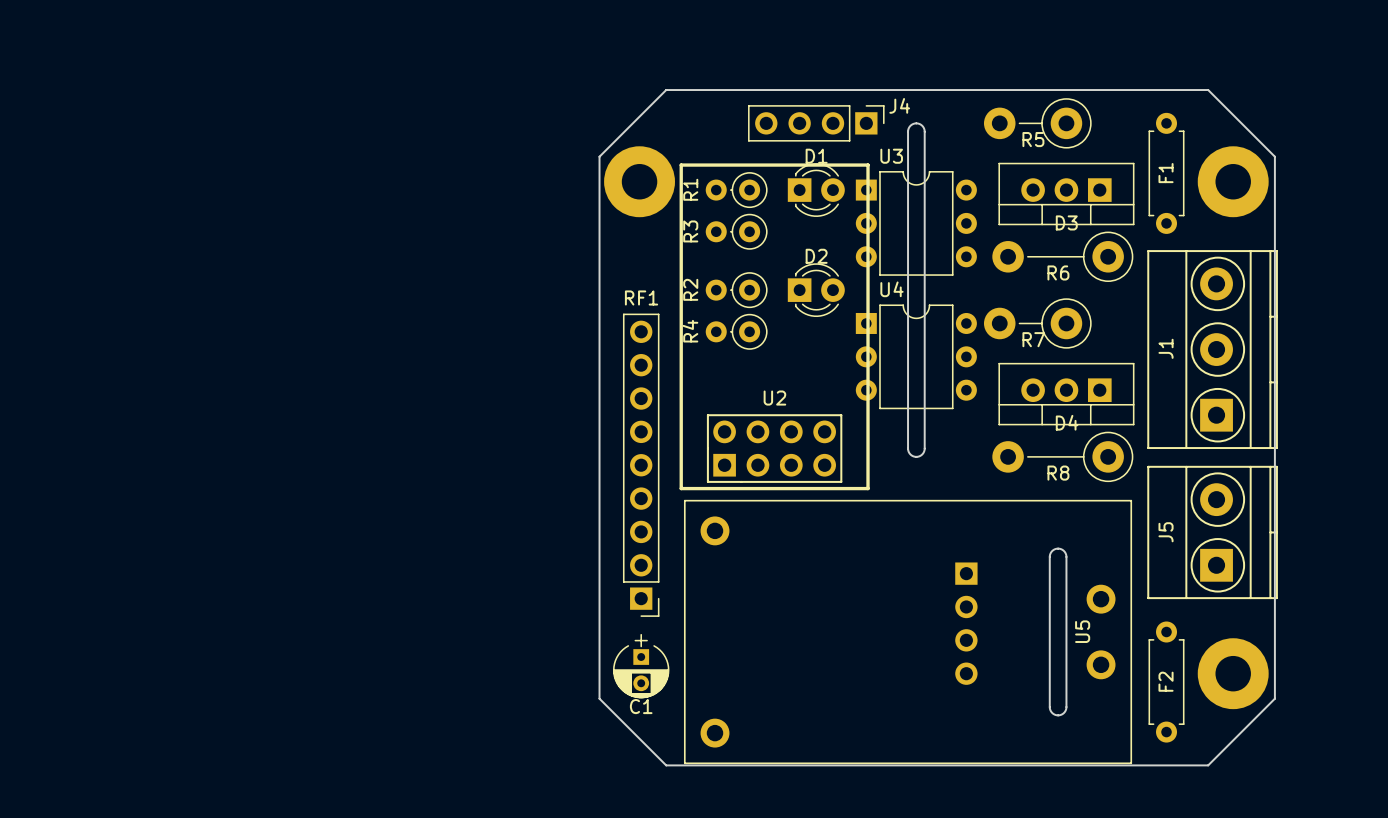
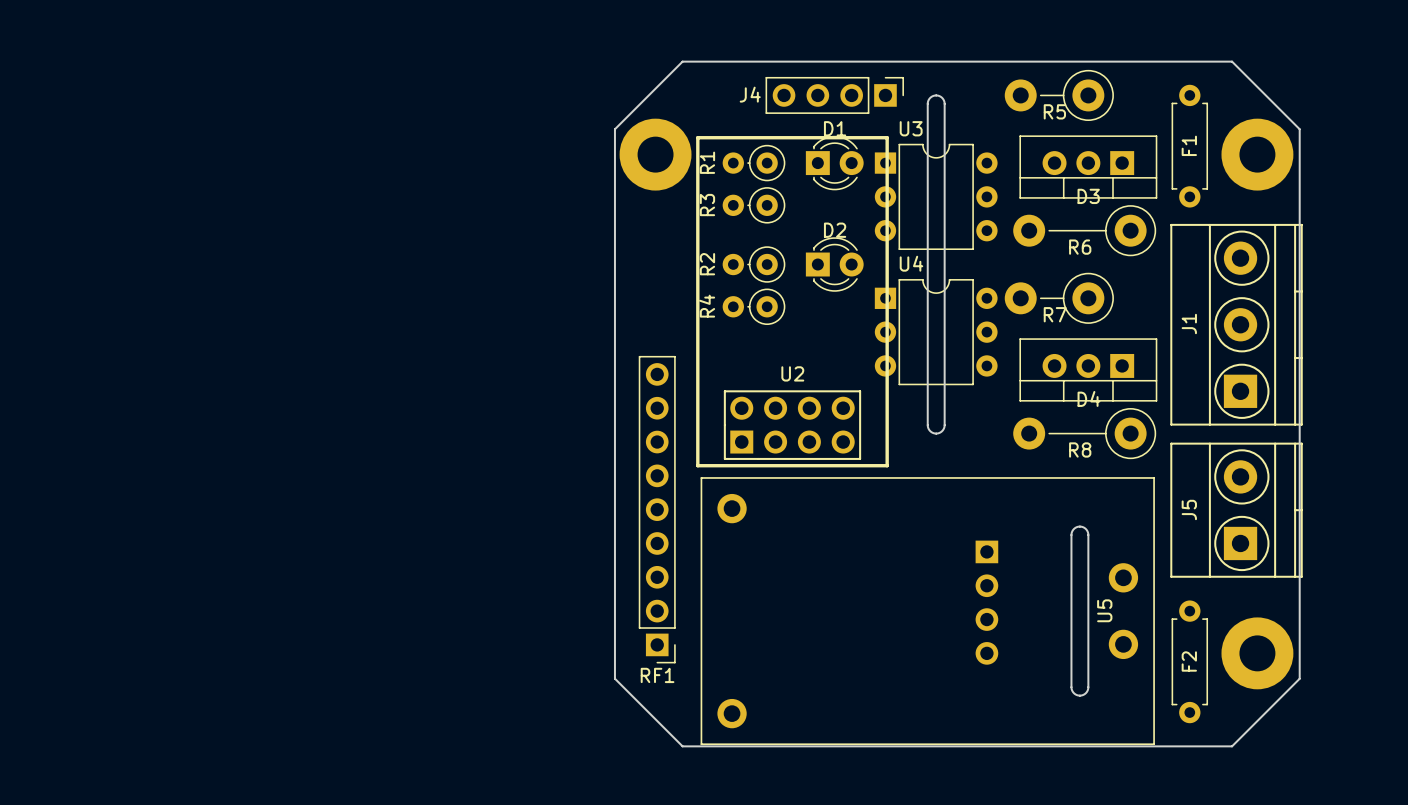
J4 name position: J4 (899, 105) -> J4 (750, 94)
RF1 name position: RF1 (641, 297) -> RF1 (657, 675)
RF1 position: (641, 465) -> (657, 509)
C1: (641, 666) -> none

